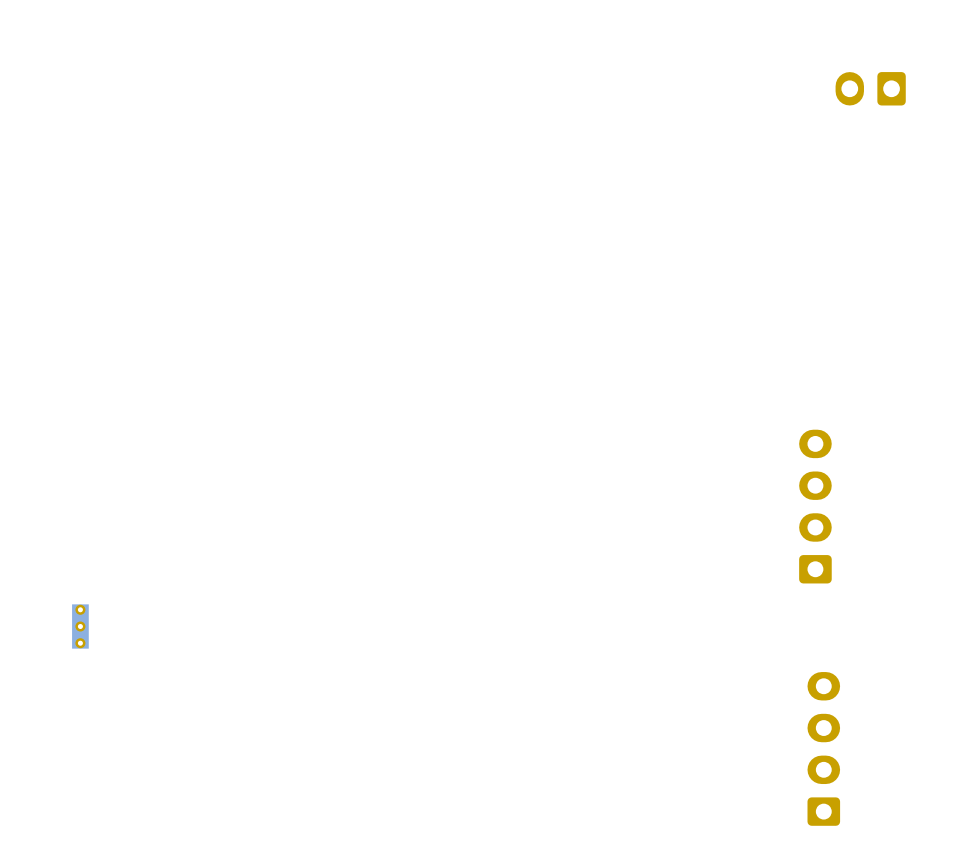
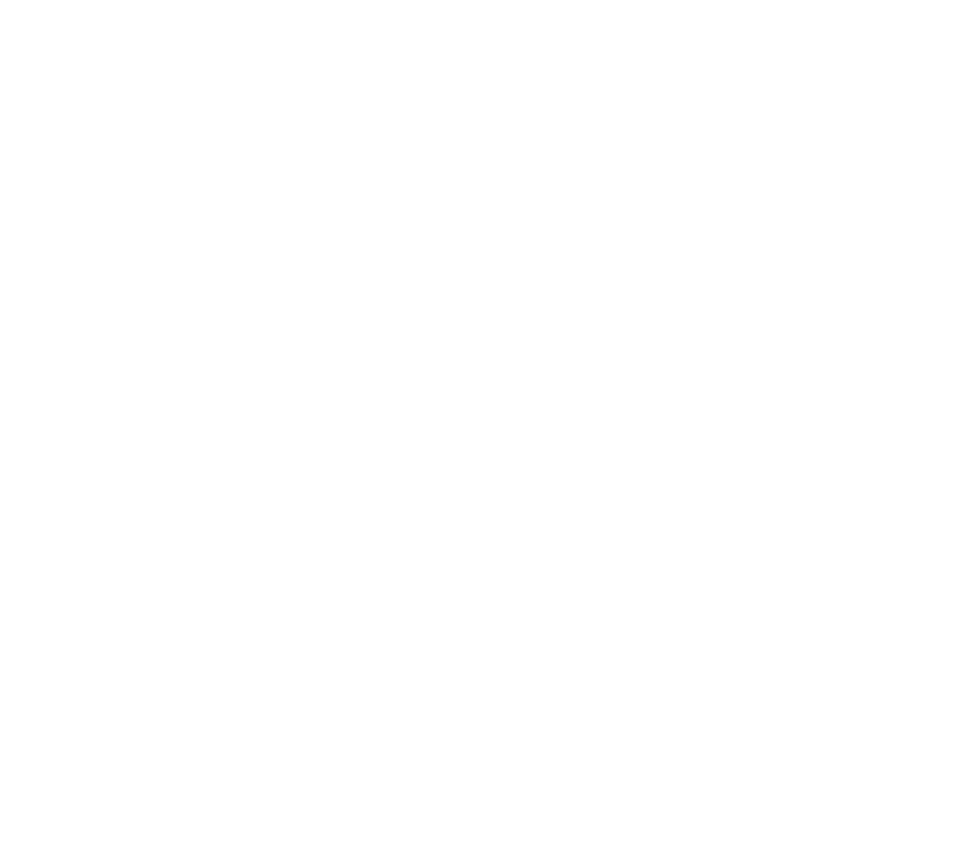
part: (870, 88) -> none
part: (815, 506) -> none
part: (80, 626) -> none
part: (823, 748) -> none

